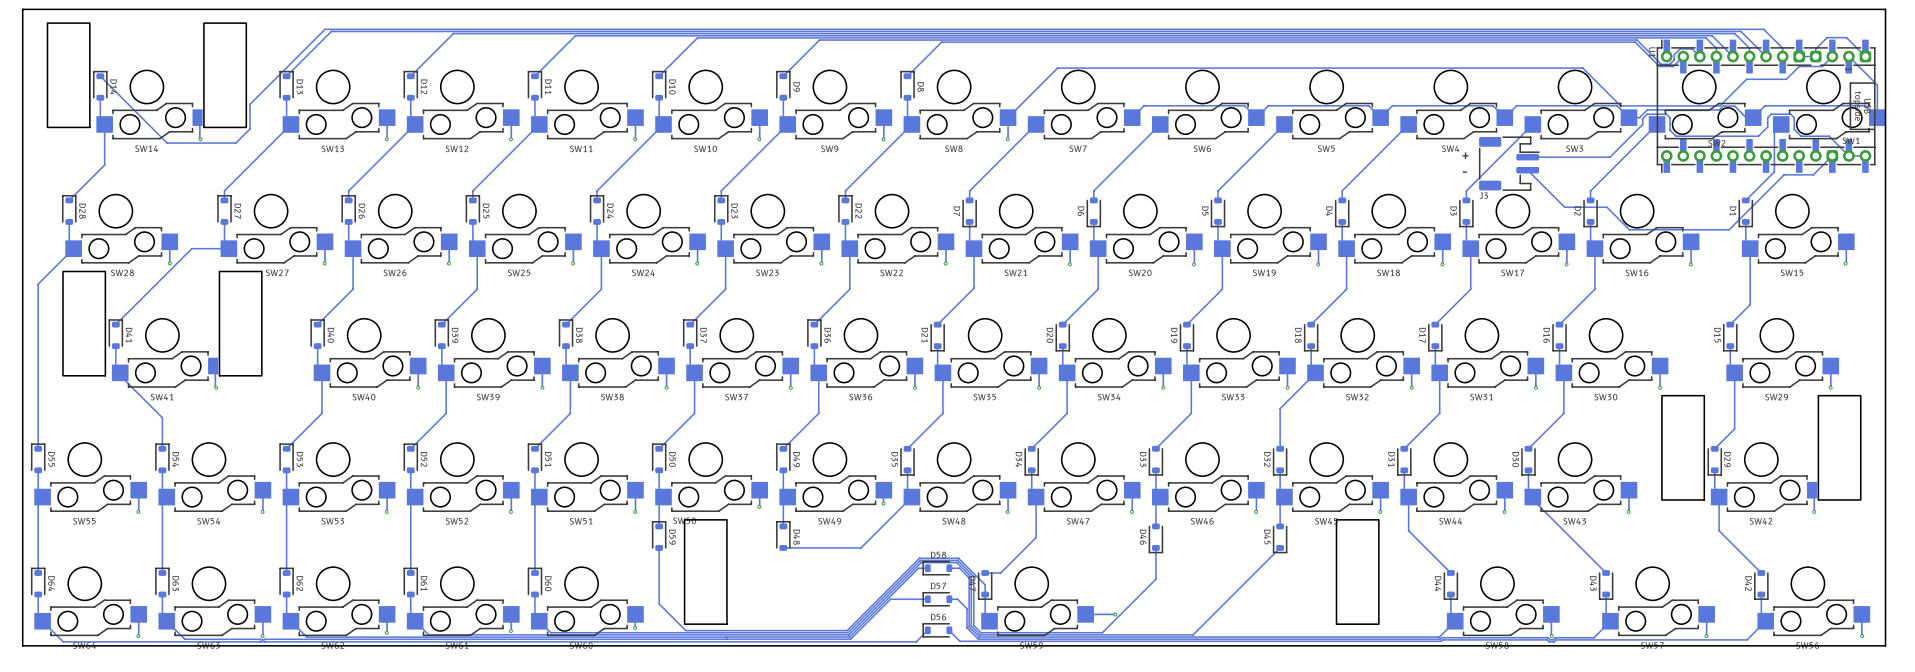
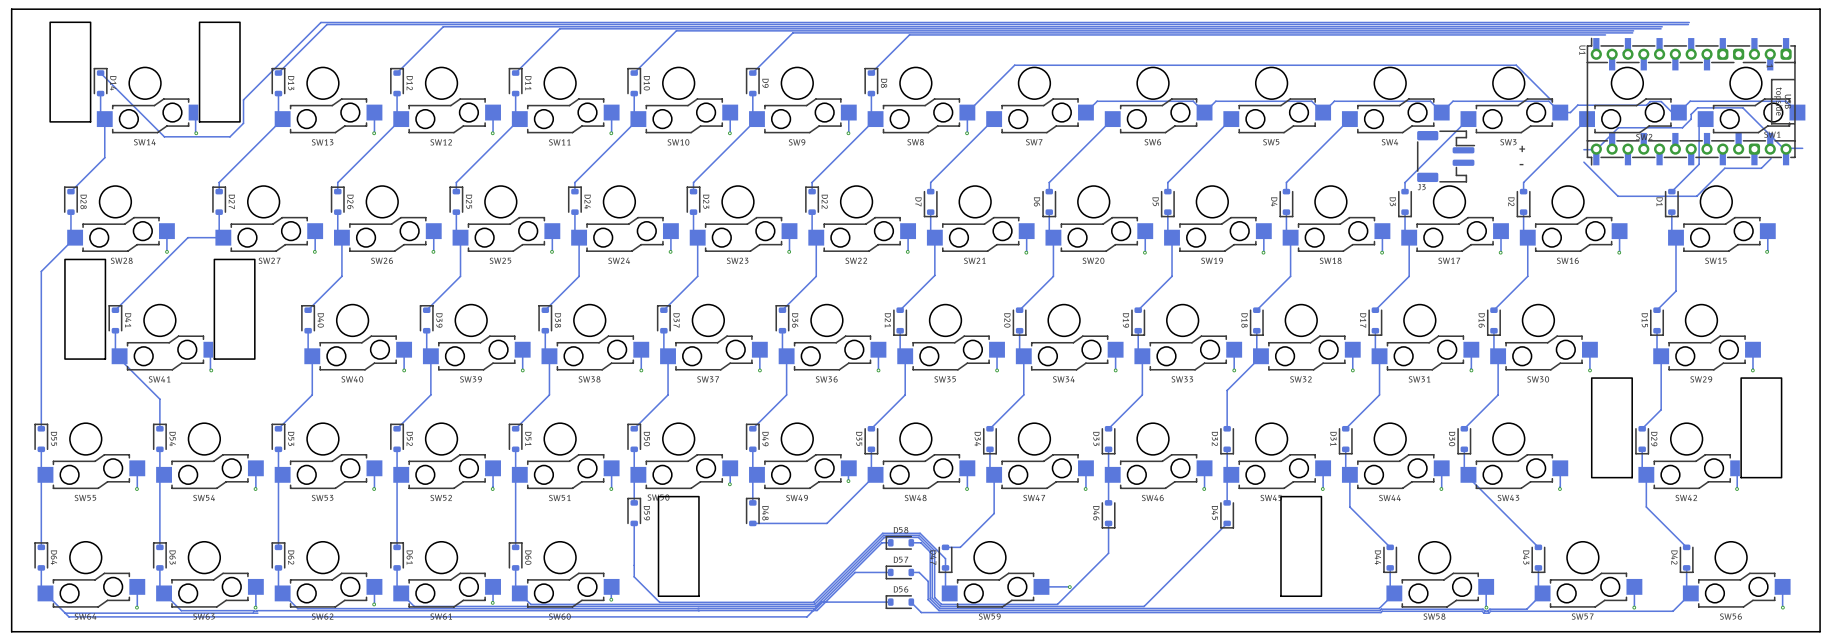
board edge: (1885, 9) (1885, 645) (22, 645) (22, 9) -> (1805, 9) (1820, 9) (1820, 631) (11, 631) (11, 9) (26, 9)
track: (325, 29) (1763, 29) (1782, 48) (1782, 56) -> (315, 28) (320, 22) (1689, 22)
track: (331, 31) (1741, 31) (1766, 56) -> (321, 30) (326, 24) (1688, 24)
track: (453, 33) (1734, 33) (1749, 48) (1749, 56) -> (437, 32) (443, 26) (1662, 26)
track: (575, 35) (1712, 35) (1732, 56) -> (554, 34) (559, 28) (1661, 28)
track: (697, 37) (1706, 37) (1716, 48) (1716, 56) -> (670, 36) (676, 30) (1633, 30)
track: (819, 40) (1636, 40) (1661, 64) (1669, 64) (1674, 59) (1674, 54) (1680, 48) (1692, 48) (1699, 56) -> (787, 38) (792, 32) (1632, 32)
track: (941, 42) (1635, 42) (1659, 66) (1673, 66) (1683, 56) -> (903, 40) (909, 34) (1605, 34)
track: (1832, 56) (1822, 66) (1799, 66) (1786, 79) (1746, 79) (1720, 105) (1620, 105) -> none
track: (1848, 56) (1877, 85) (1877, 117) -> none
track: (1865, 56) (1846, 37) (1827, 37) (1815, 48) (1815, 56) (1799, 56) -> none
track: (1771, 114) (1790, 114) (1794, 117) (1794, 129) (1801, 136) (1829, 136) (1848, 155) (1865, 155) -> (1696, 109) (1742, 107) (1783, 148) (1802, 148)
track: (1767, 117) (1767, 126) (1758, 136) (1676, 136) (1670, 130) (1670, 117) (1666, 114) (1647, 114) (1642, 118) (1642, 124) (1610, 157) (1527, 157) -> (1692, 112) (1691, 119) (1682, 127) (1618, 127) (1596, 149) (1583, 149)
text position: + (1465, 155) -> + (1522, 148)
track: (1832, 155) (1813, 174) (1784, 174) (1729, 229) (1629, 229) (1606, 207) (1564, 207) (1527, 170) -> none
track: none -> (1771, 158) (1761, 168) (1724, 168) (1696, 196) (1618, 196) (1583, 162)
text position: - (1464, 172) -> - (1521, 164)
track: (927, 630) (916, 641) (265, 641) -> (890, 602) (821, 602) (807, 616) (68, 616) (65, 613)

